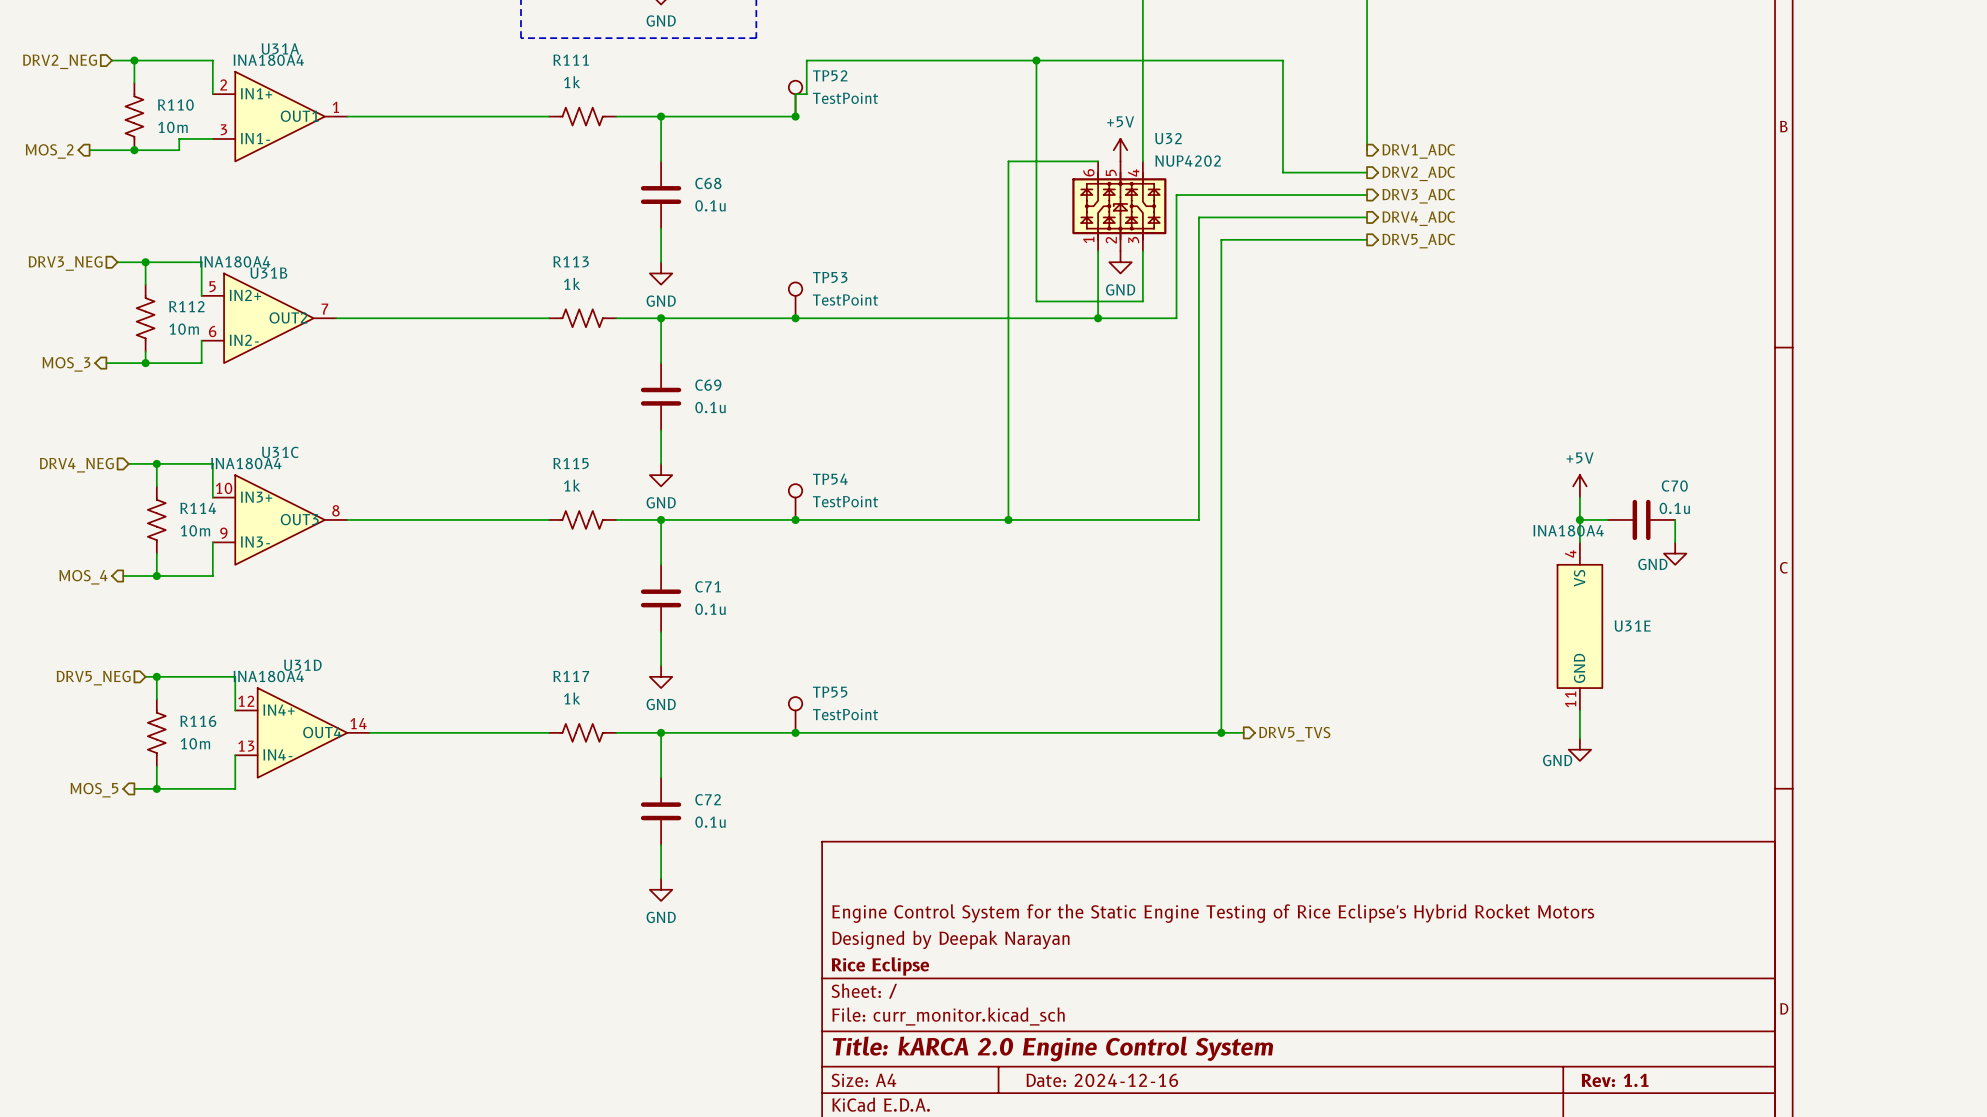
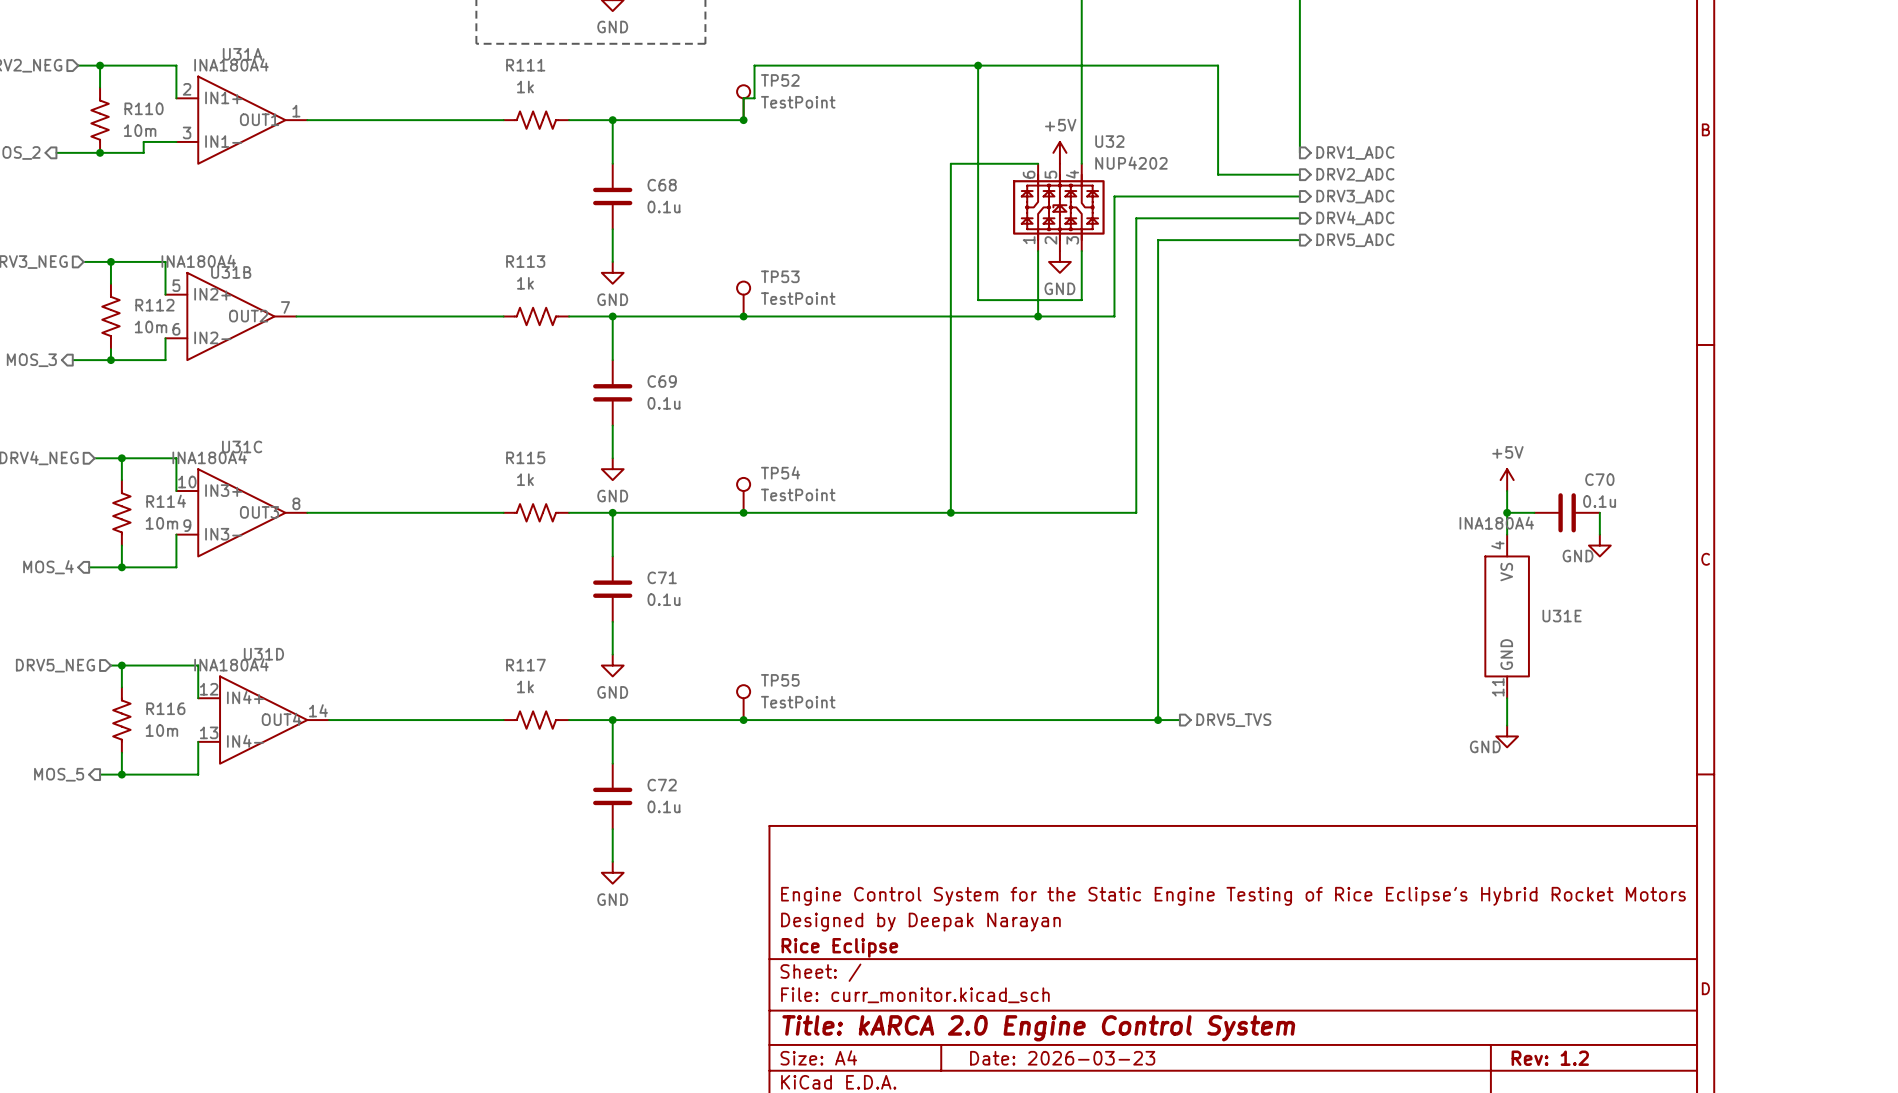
title block: Date: 2024-12-16 (1102, 1080) -> Date: 2026-03-23 (1062, 1058)
title block: Rev: 1.1 (1615, 1080) -> Rev: 1.2 (1550, 1058)

